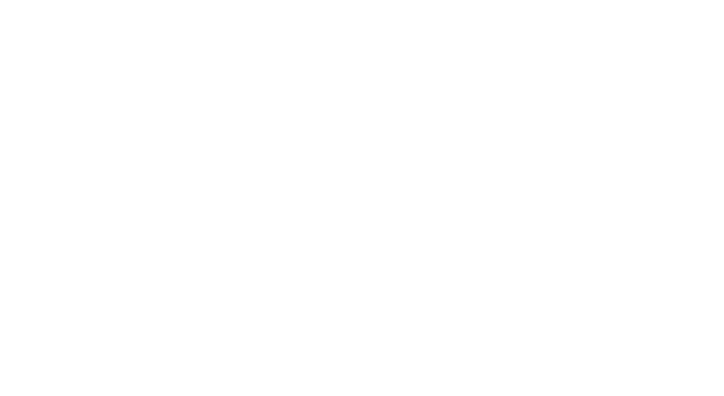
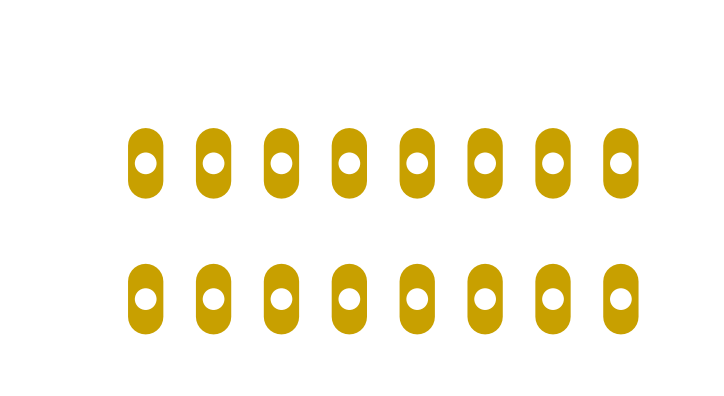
part: none -> (383, 163)
part: none -> (383, 299)

